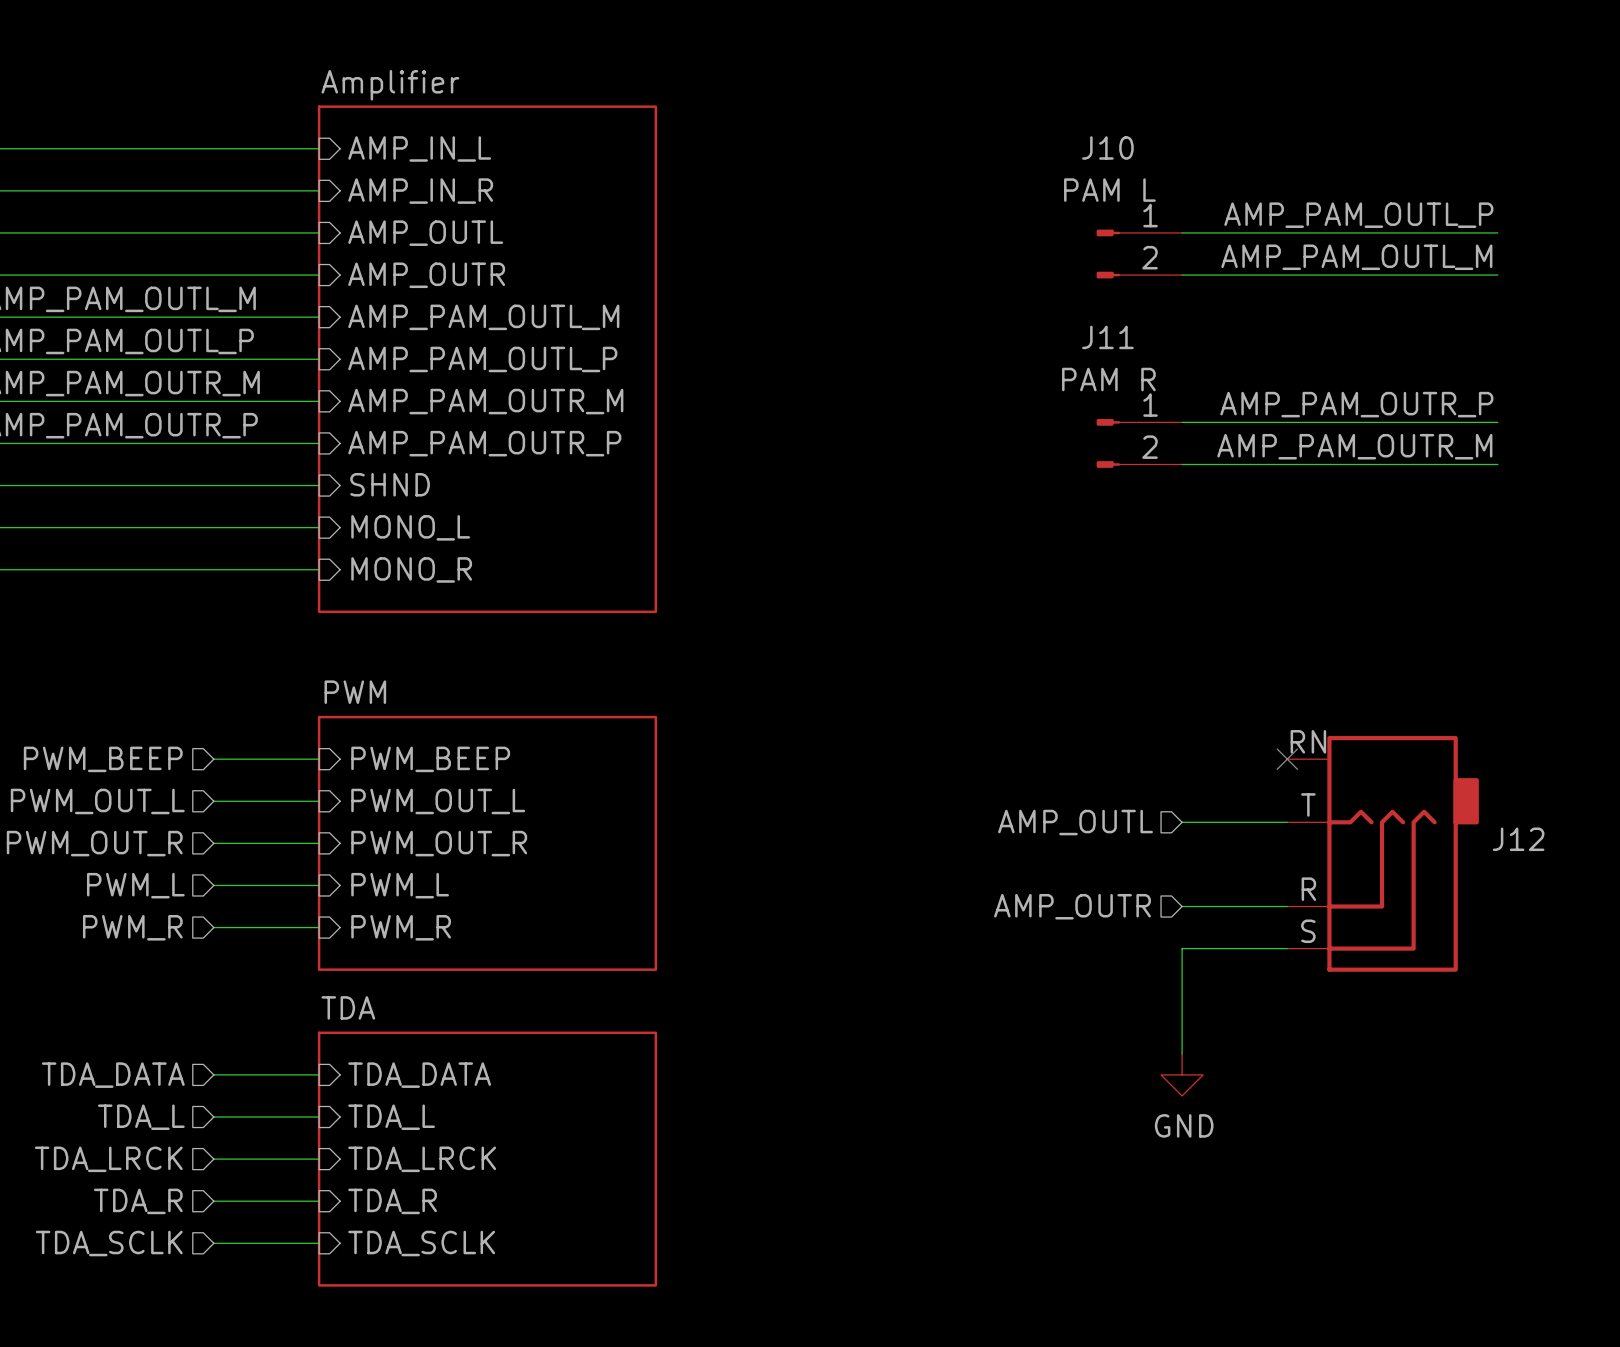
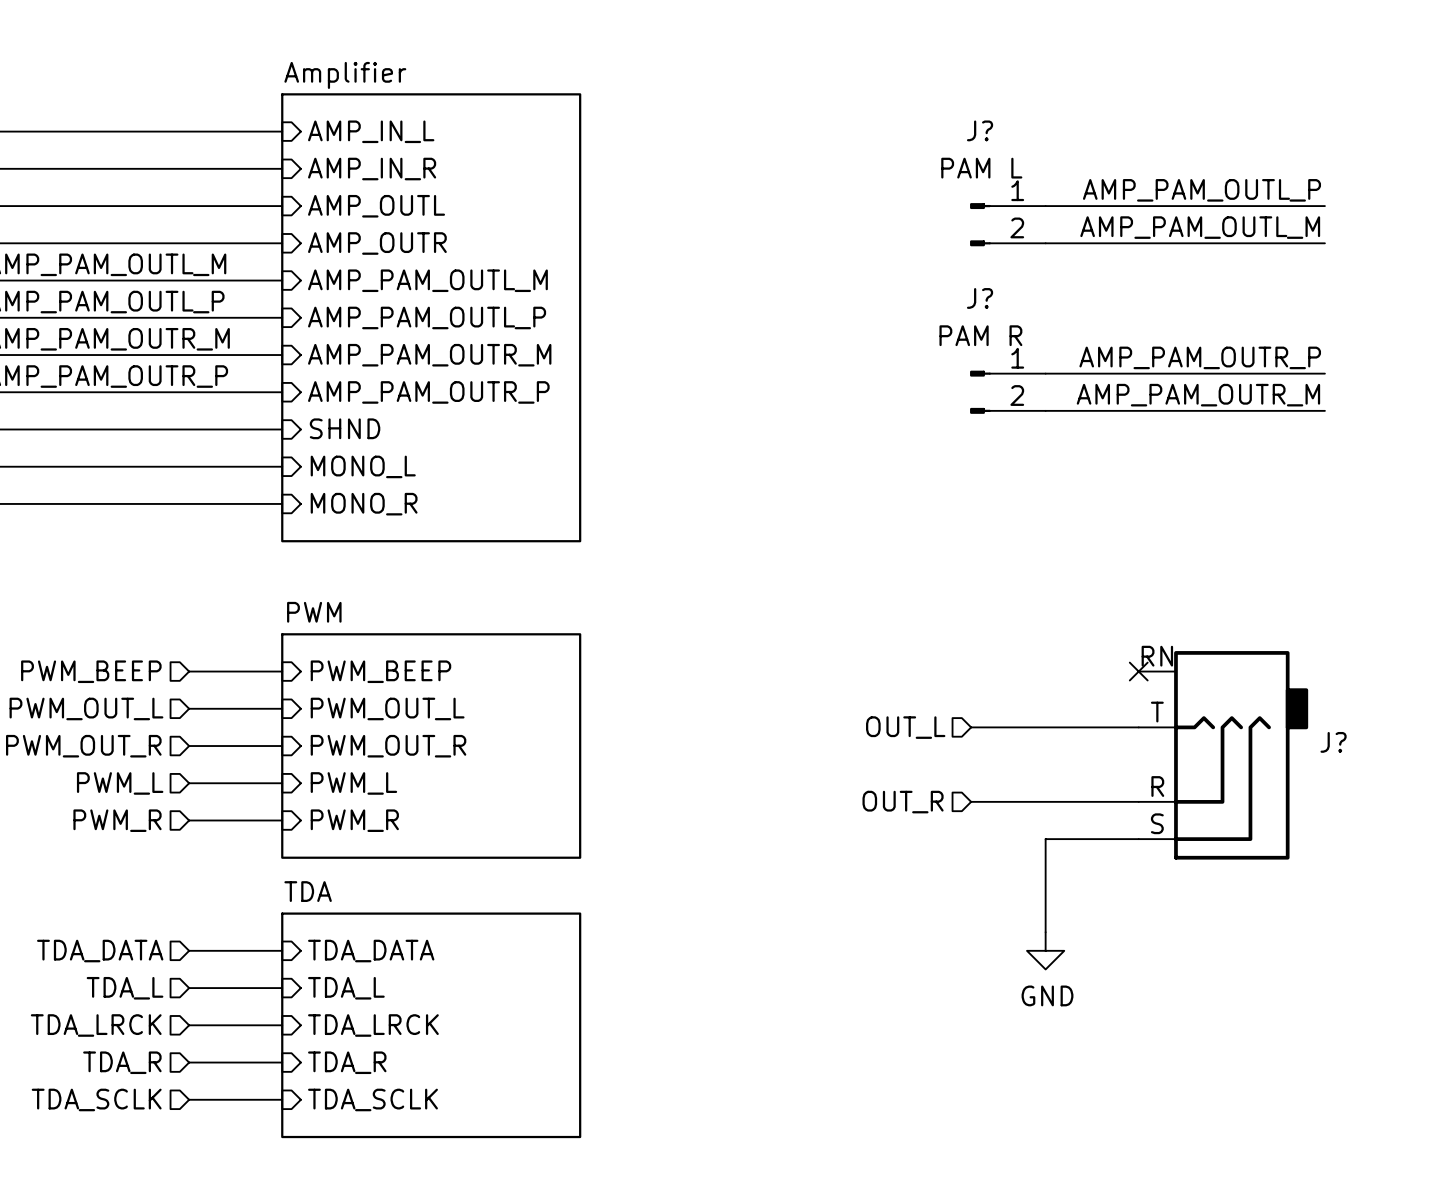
J10 name: J10 (1107, 147) -> J? (980, 130)
J11 name: J11 (1107, 337) -> J? (980, 298)
hierarchical label: AMP_OUTL (1075, 822) -> OUT_L (905, 727)
wire: none -> (971, 727) (1045, 727)
J12 name: J12 (1518, 839) -> J? (1333, 742)
hierarchical label: AMP_OUTR (1072, 906) -> OUT_R (903, 802)
wire: none -> (971, 801) (1045, 801)

